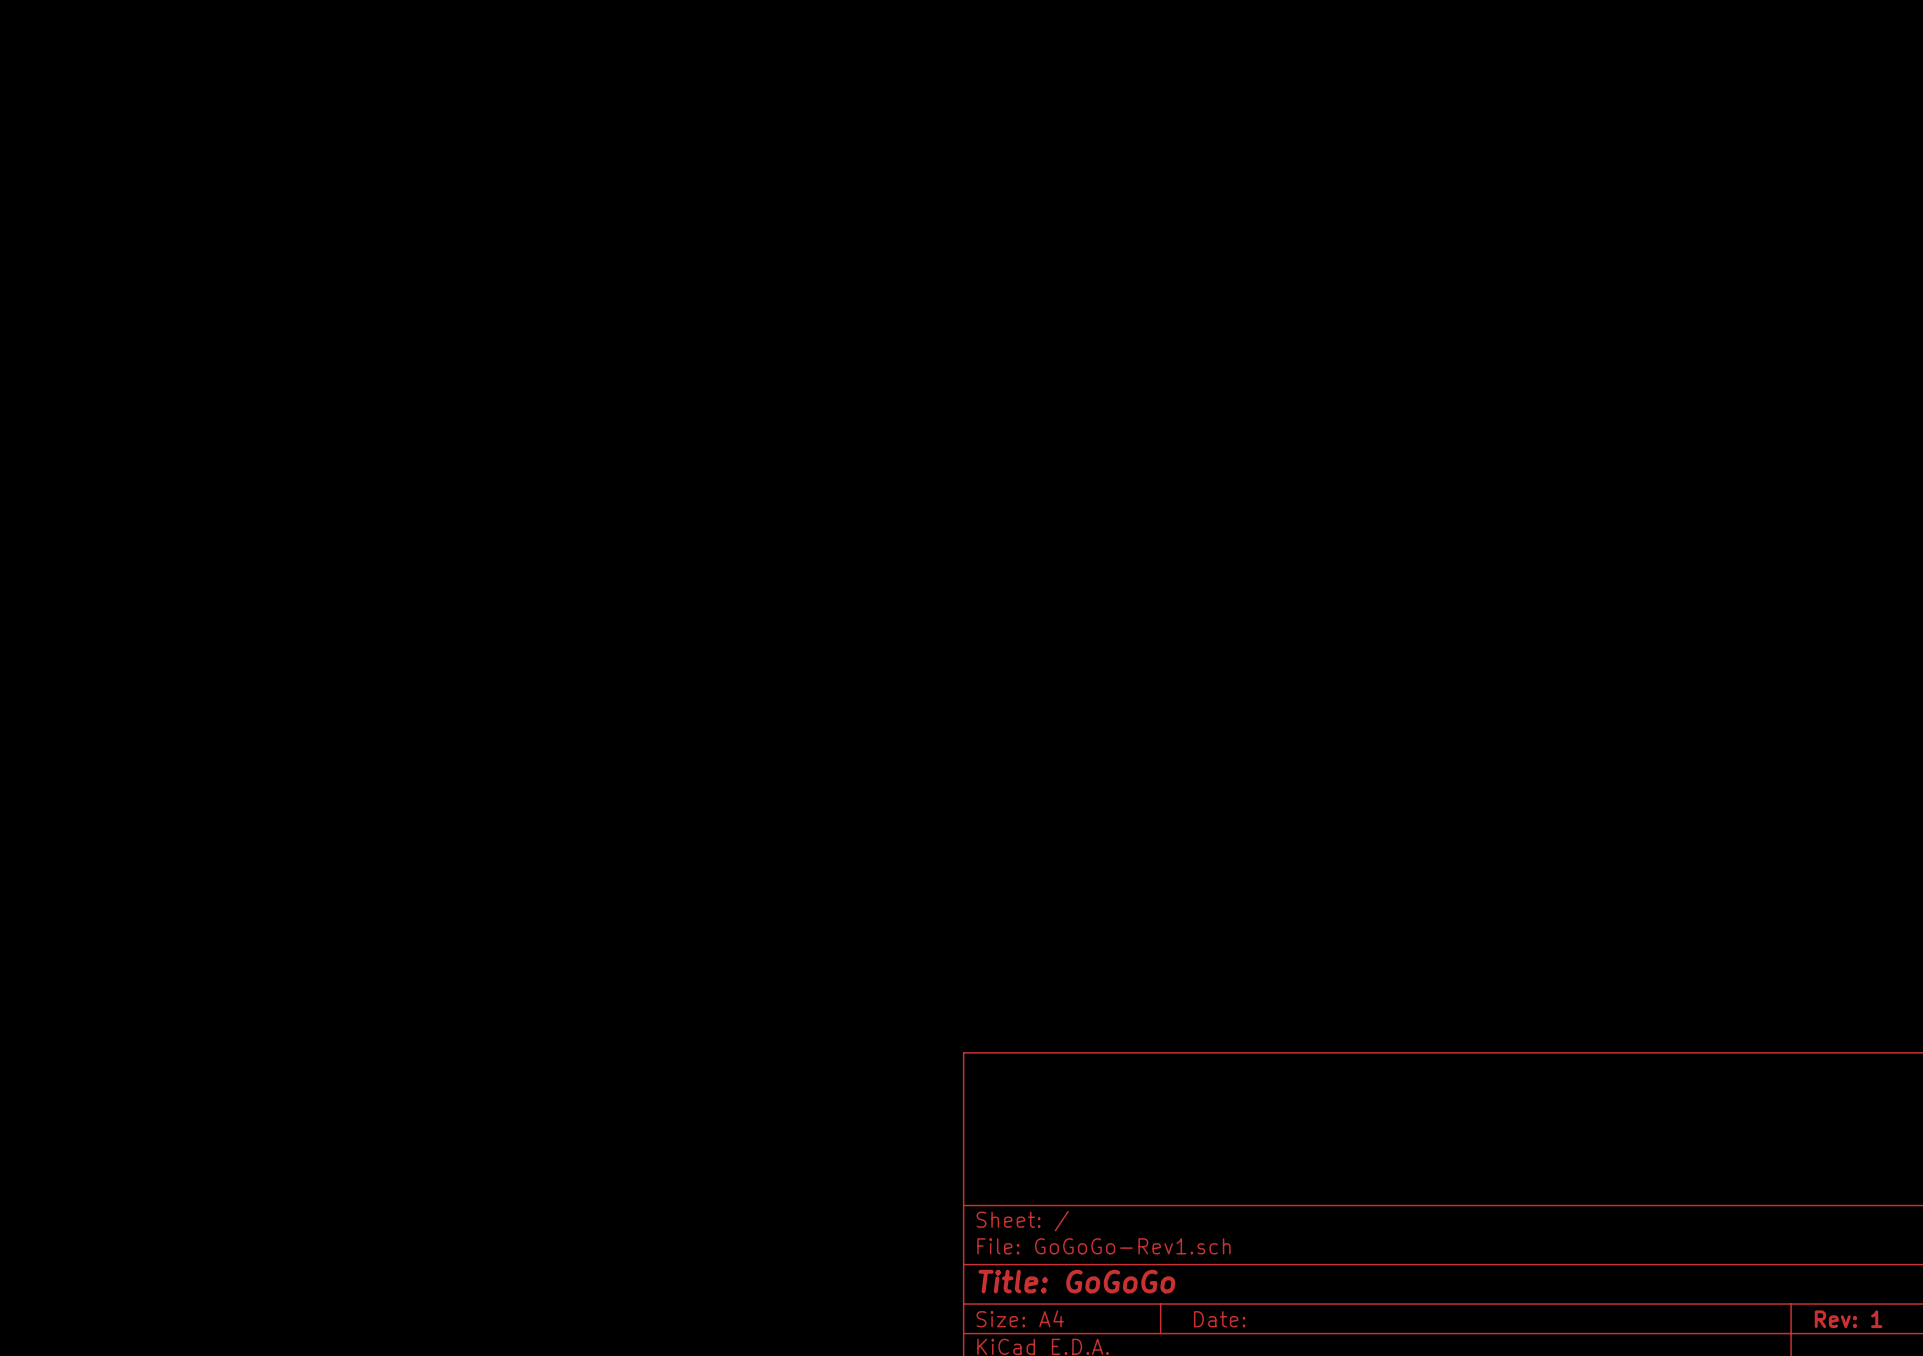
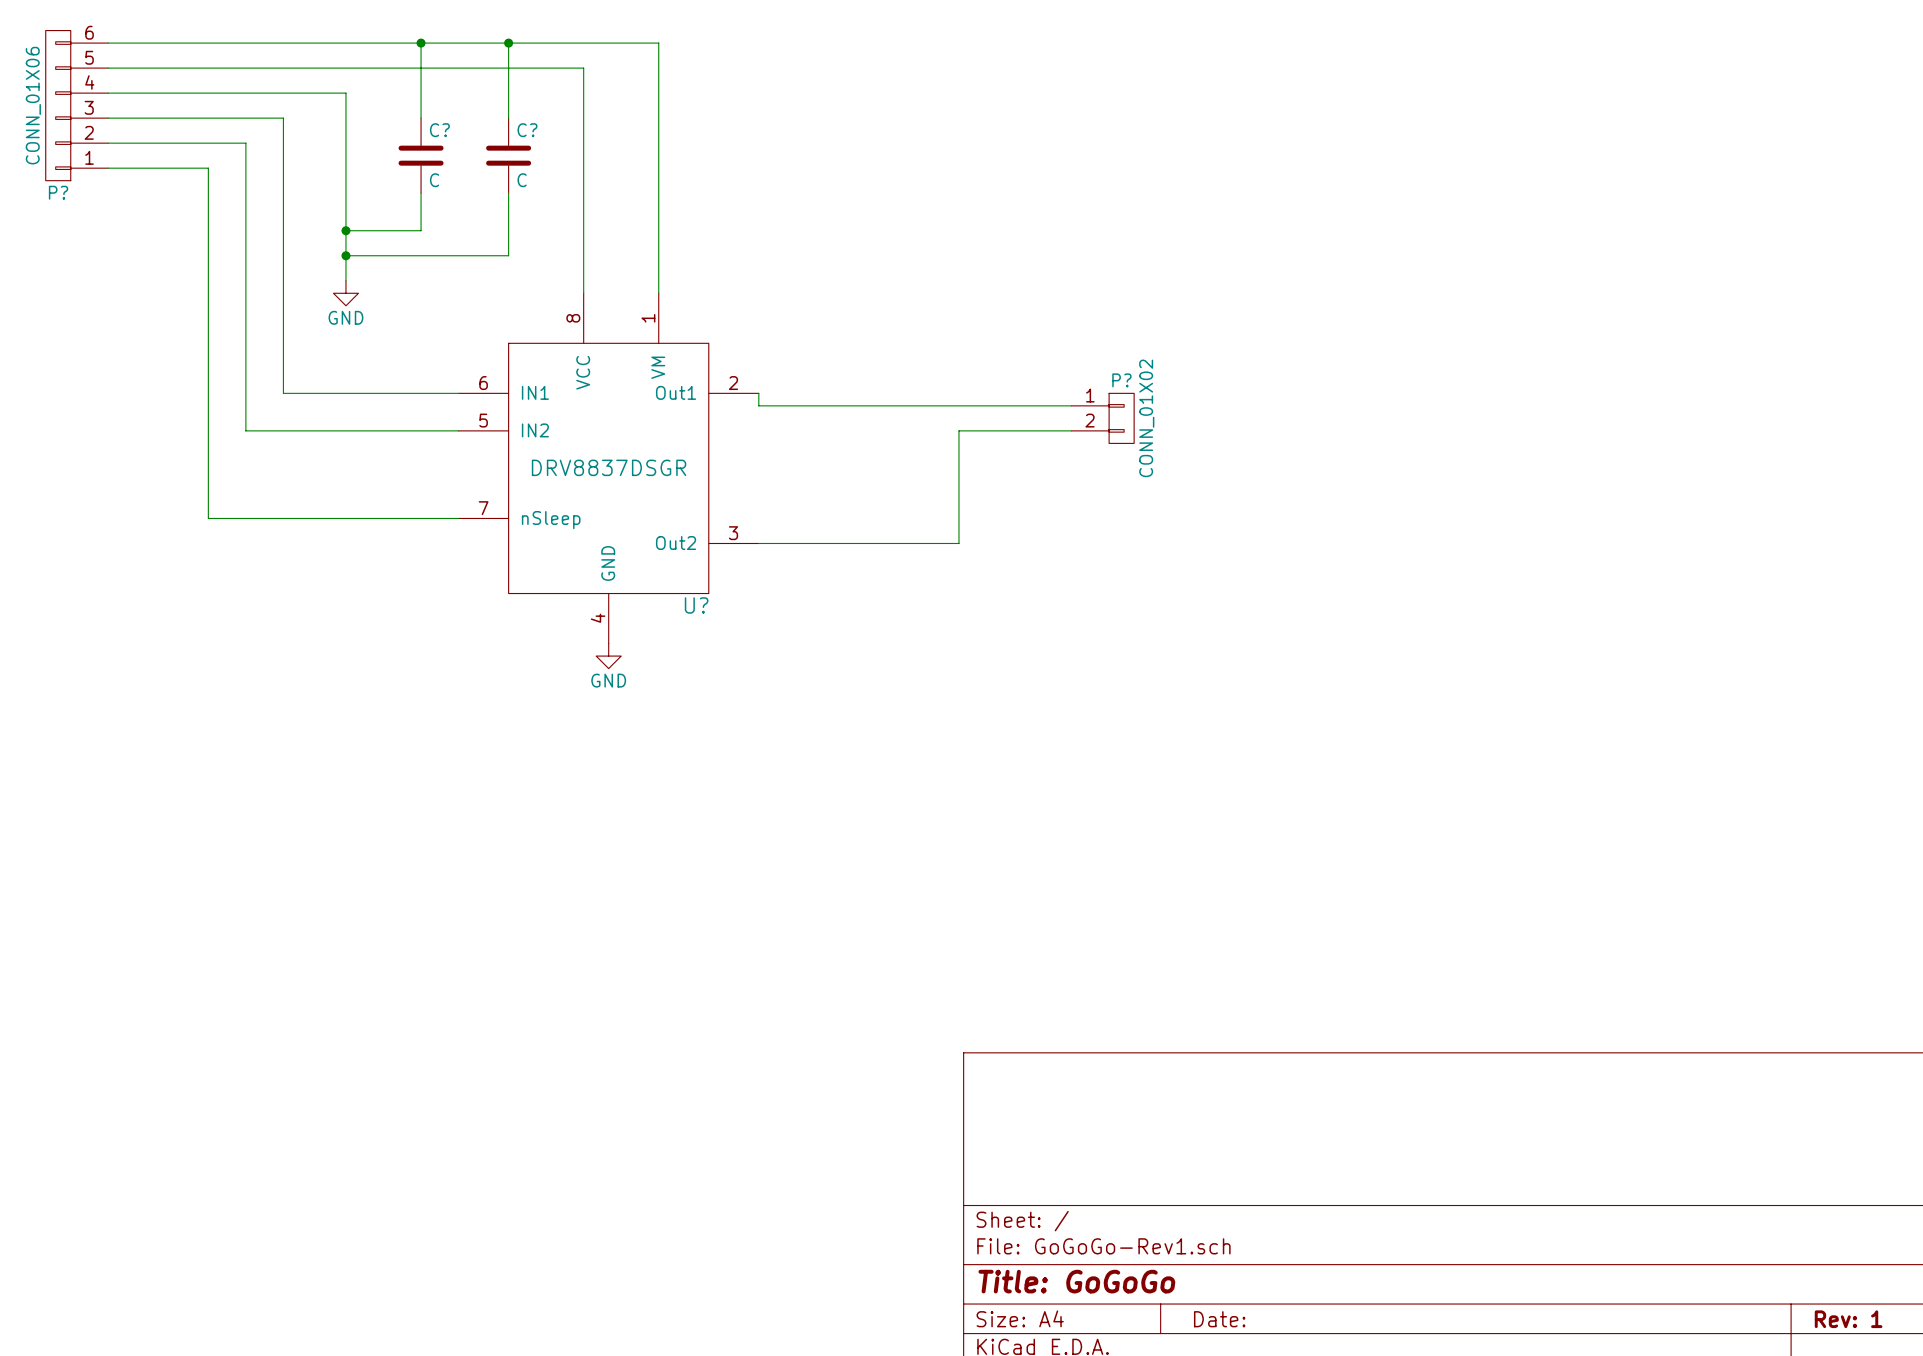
wire: none -> (108, 43) (658, 43) (658, 293)
wire: none -> (421, 43) (421, 118)
junction: none -> (421, 43)
wire: none -> (508, 43) (508, 118)
junction: none -> (508, 43)
wire: none -> (108, 68) (583, 68) (583, 293)
wire: none -> (108, 93) (345, 93) (345, 280)
P?: none -> CONN_01X06 (77, 105)
wire: none -> (108, 118) (283, 118) (283, 393) (458, 393)
wire: none -> (108, 143) (245, 143) (245, 430) (458, 430)
C?: none -> C (421, 155)
C?: none -> C (508, 155)
wire: none -> (108, 168) (208, 168) (208, 518) (458, 518)
wire: none -> (421, 193) (421, 230) (345, 230)
wire: none -> (508, 193) (508, 255) (345, 255)
junction: none -> (345, 230)
junction: none -> (345, 255)
power symbol: none -> GND (345, 293)
wire: none -> (758, 393) (758, 405) (1071, 405)
P?: none -> CONN_01X02 (1102, 418)
wire: none -> (1071, 430) (958, 430) (958, 543) (758, 543)
U?: none -> DRV8837DSGR (608, 468)
power symbol: none -> GND (608, 656)

